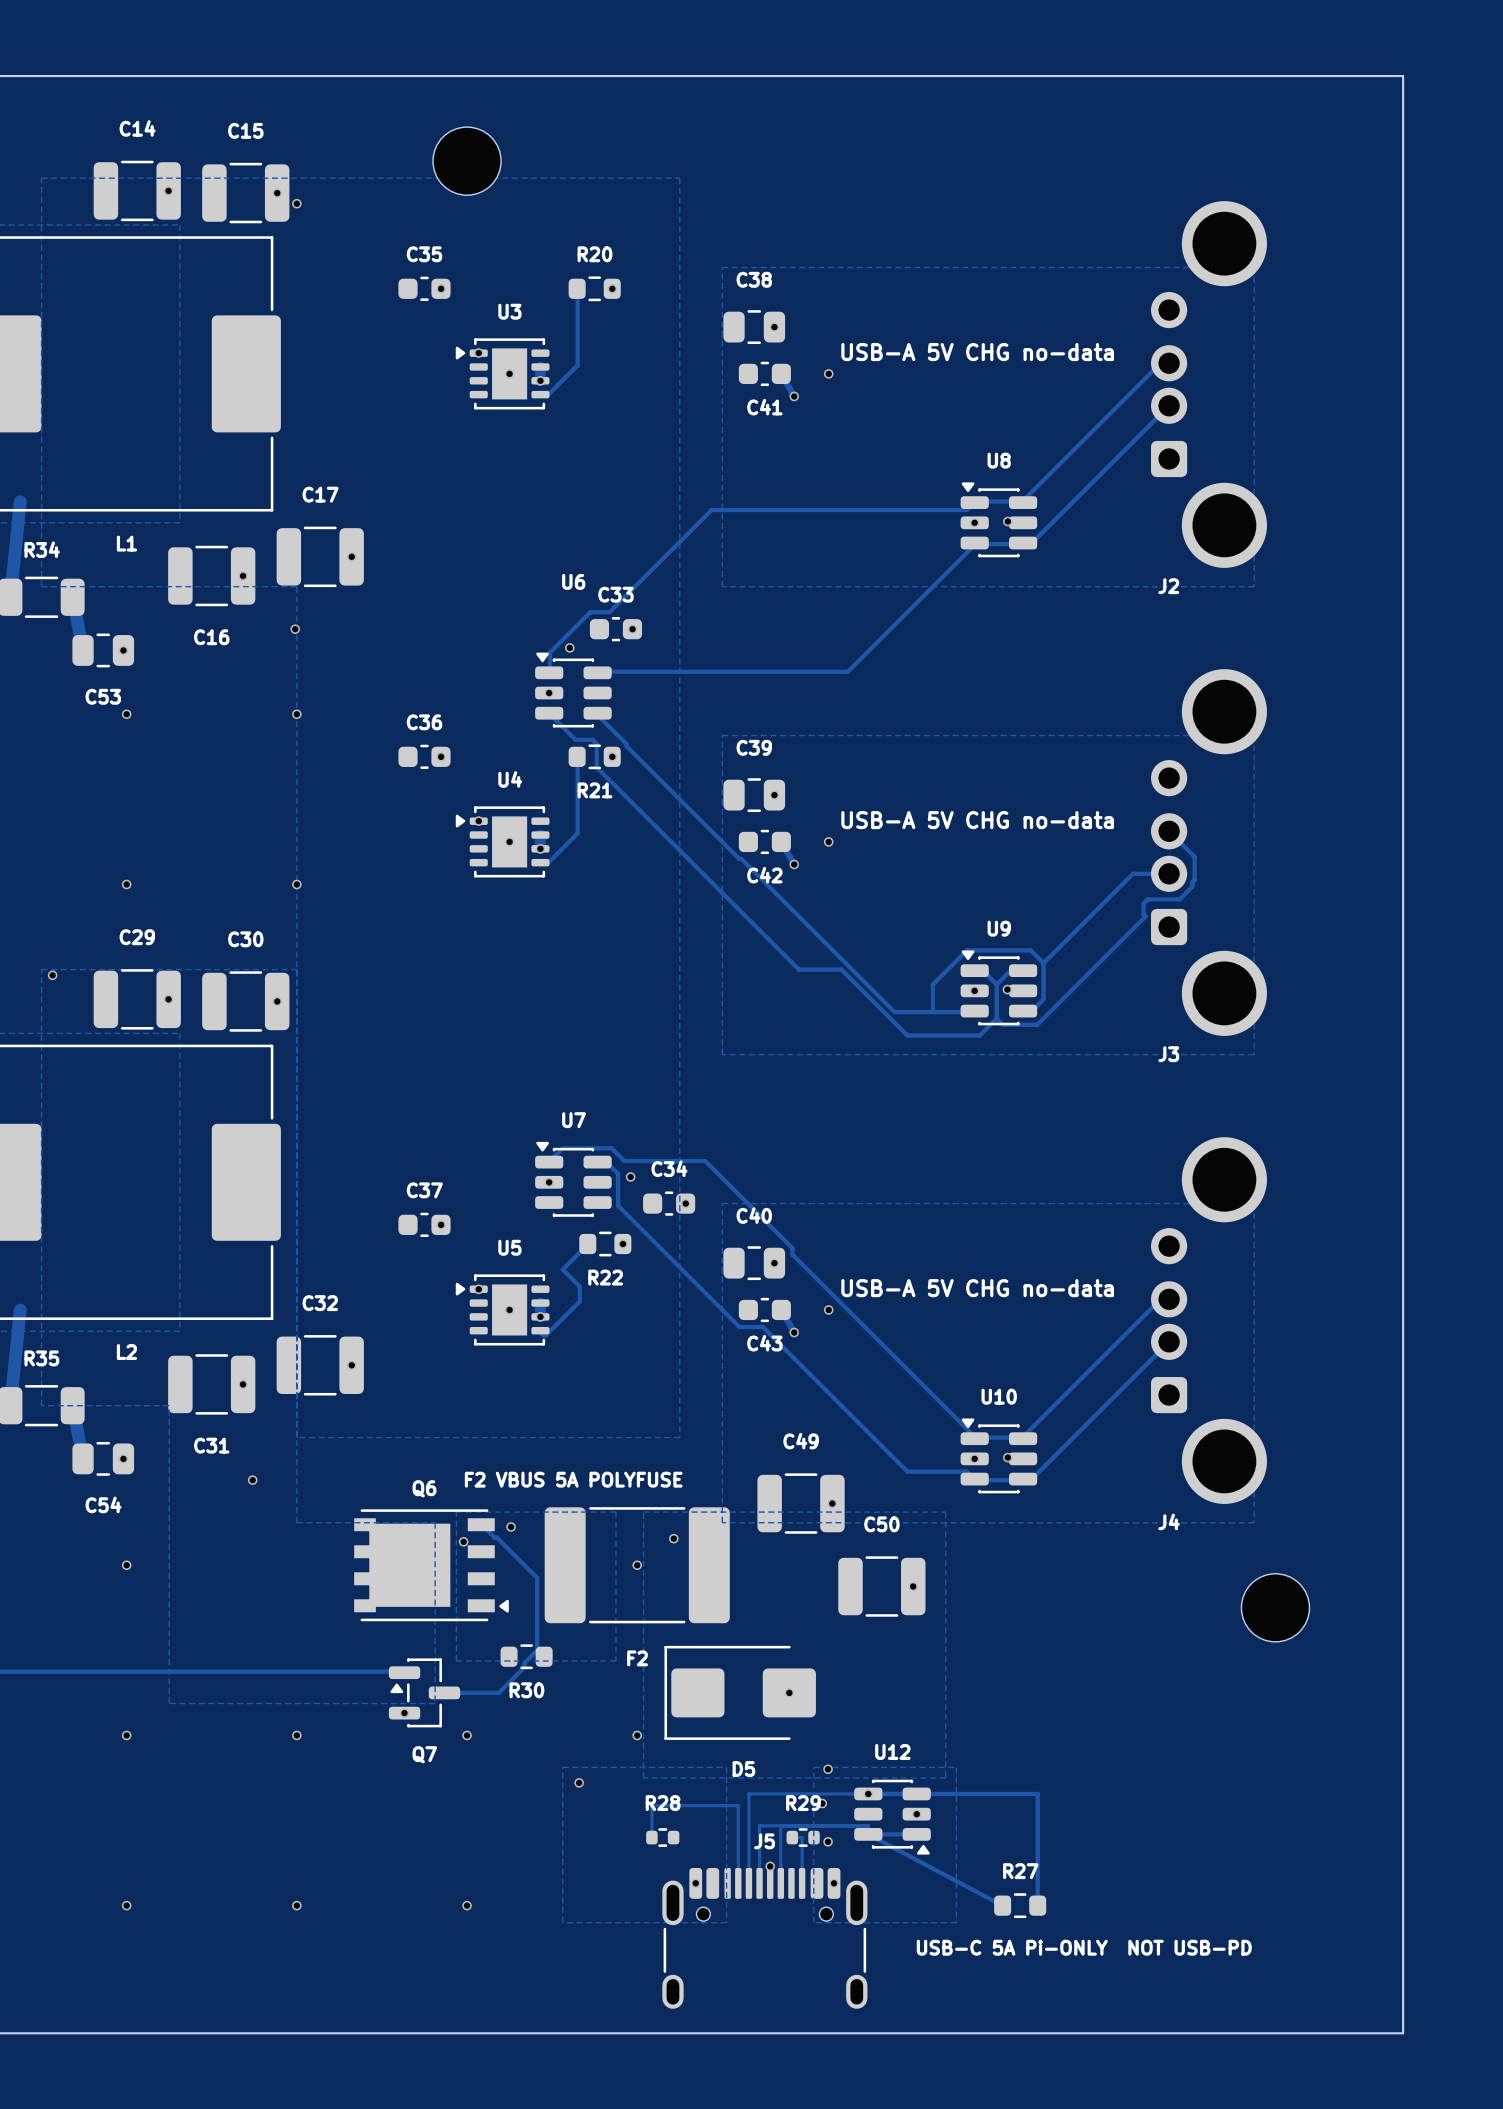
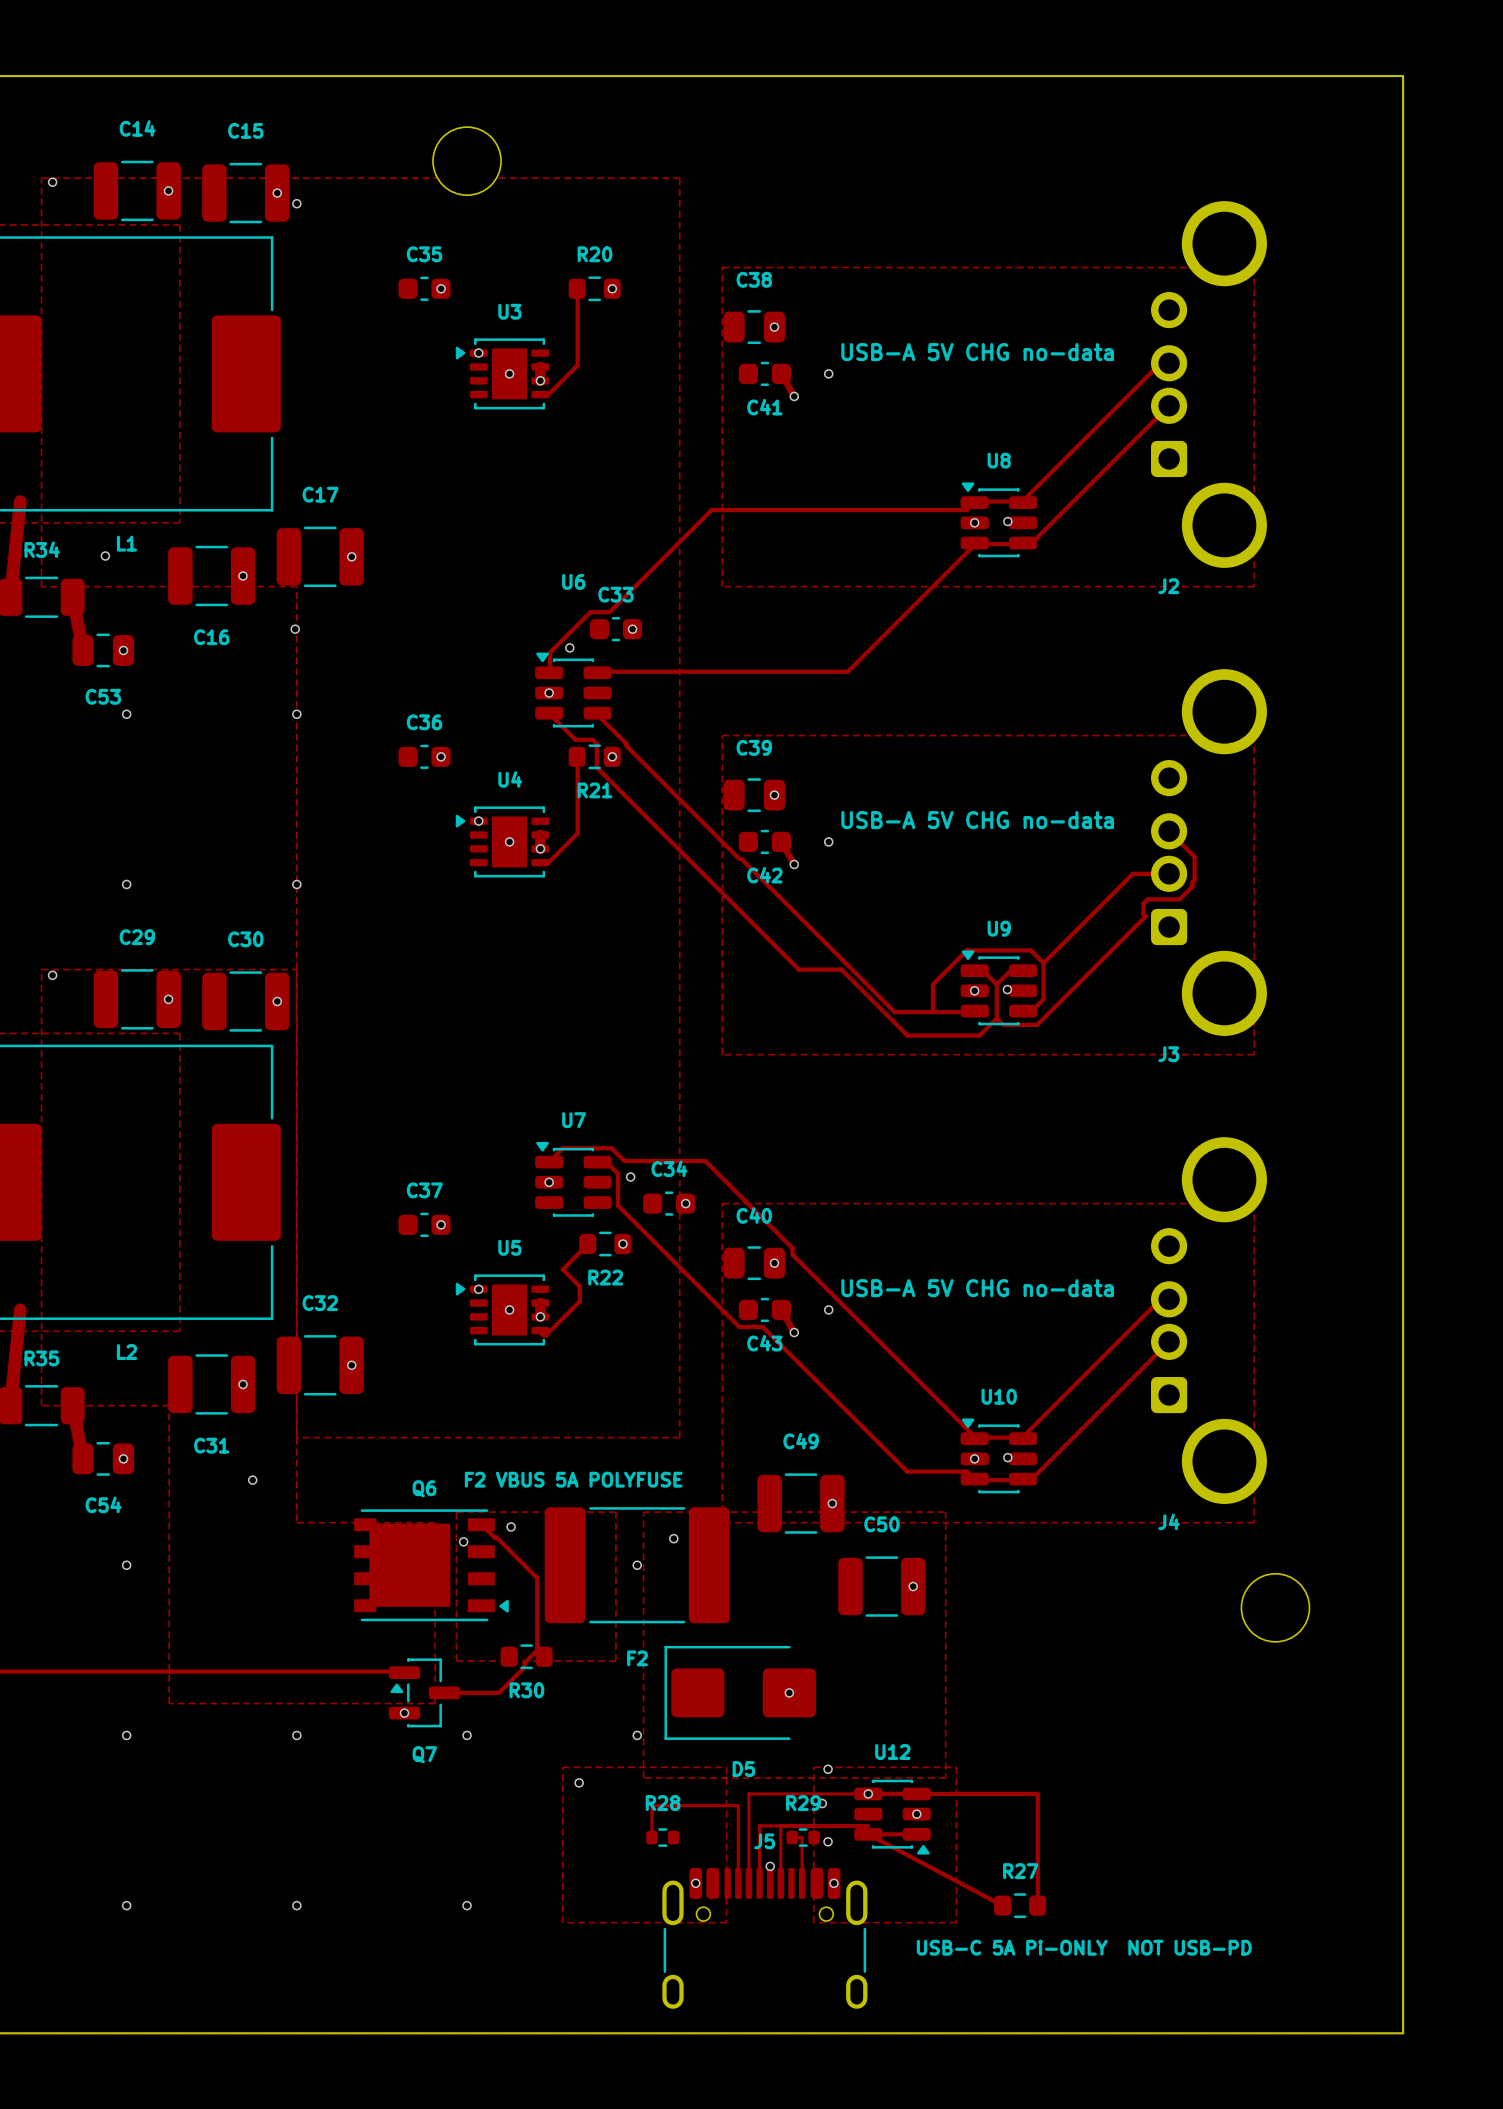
via: none -> (52, 182)
via: none -> (105, 556)

